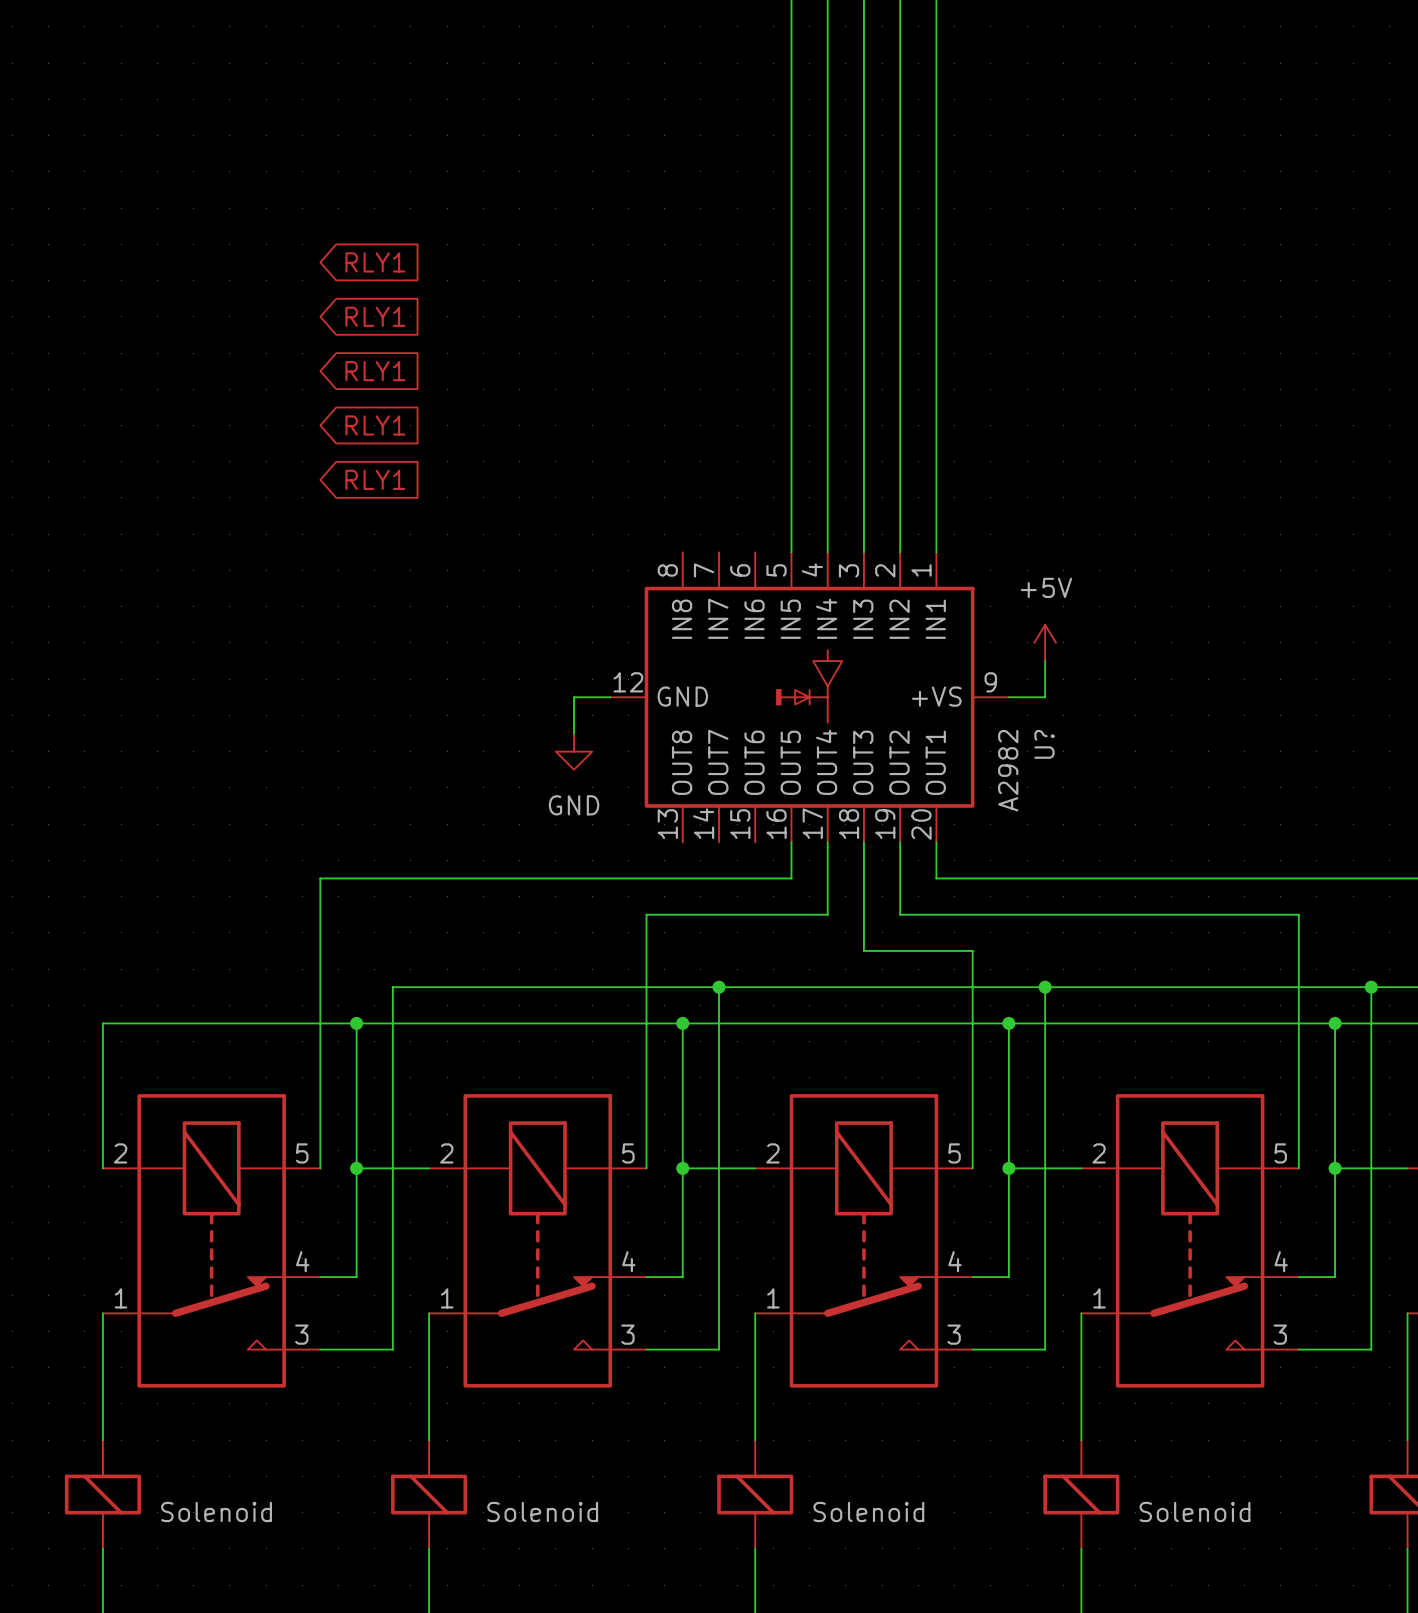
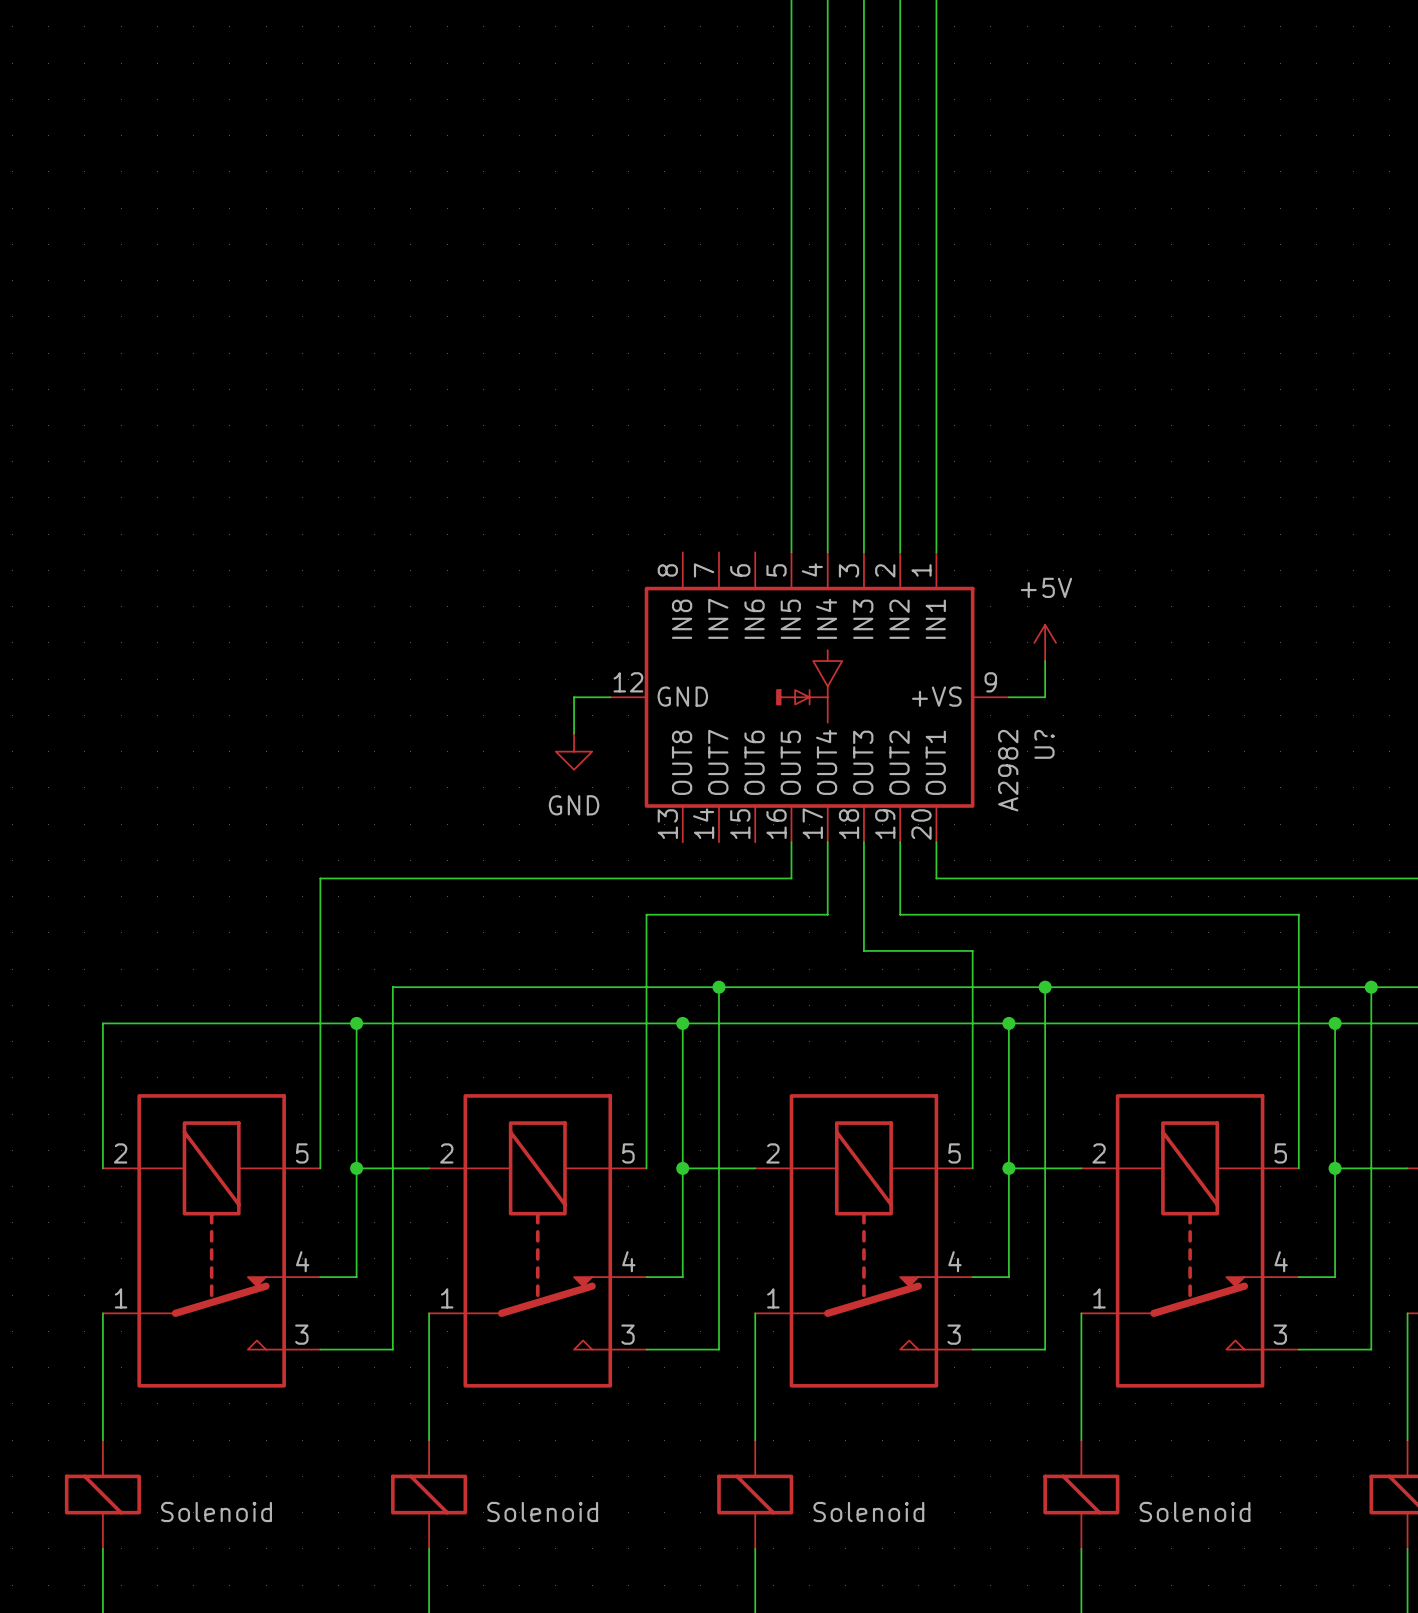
global label: RLY1 (375, 262) -> none
global label: RLY1 (375, 316) -> none
global label: RLY1 (375, 371) -> none
global label: RLY1 (375, 425) -> none
global label: RLY1 (375, 479) -> none

